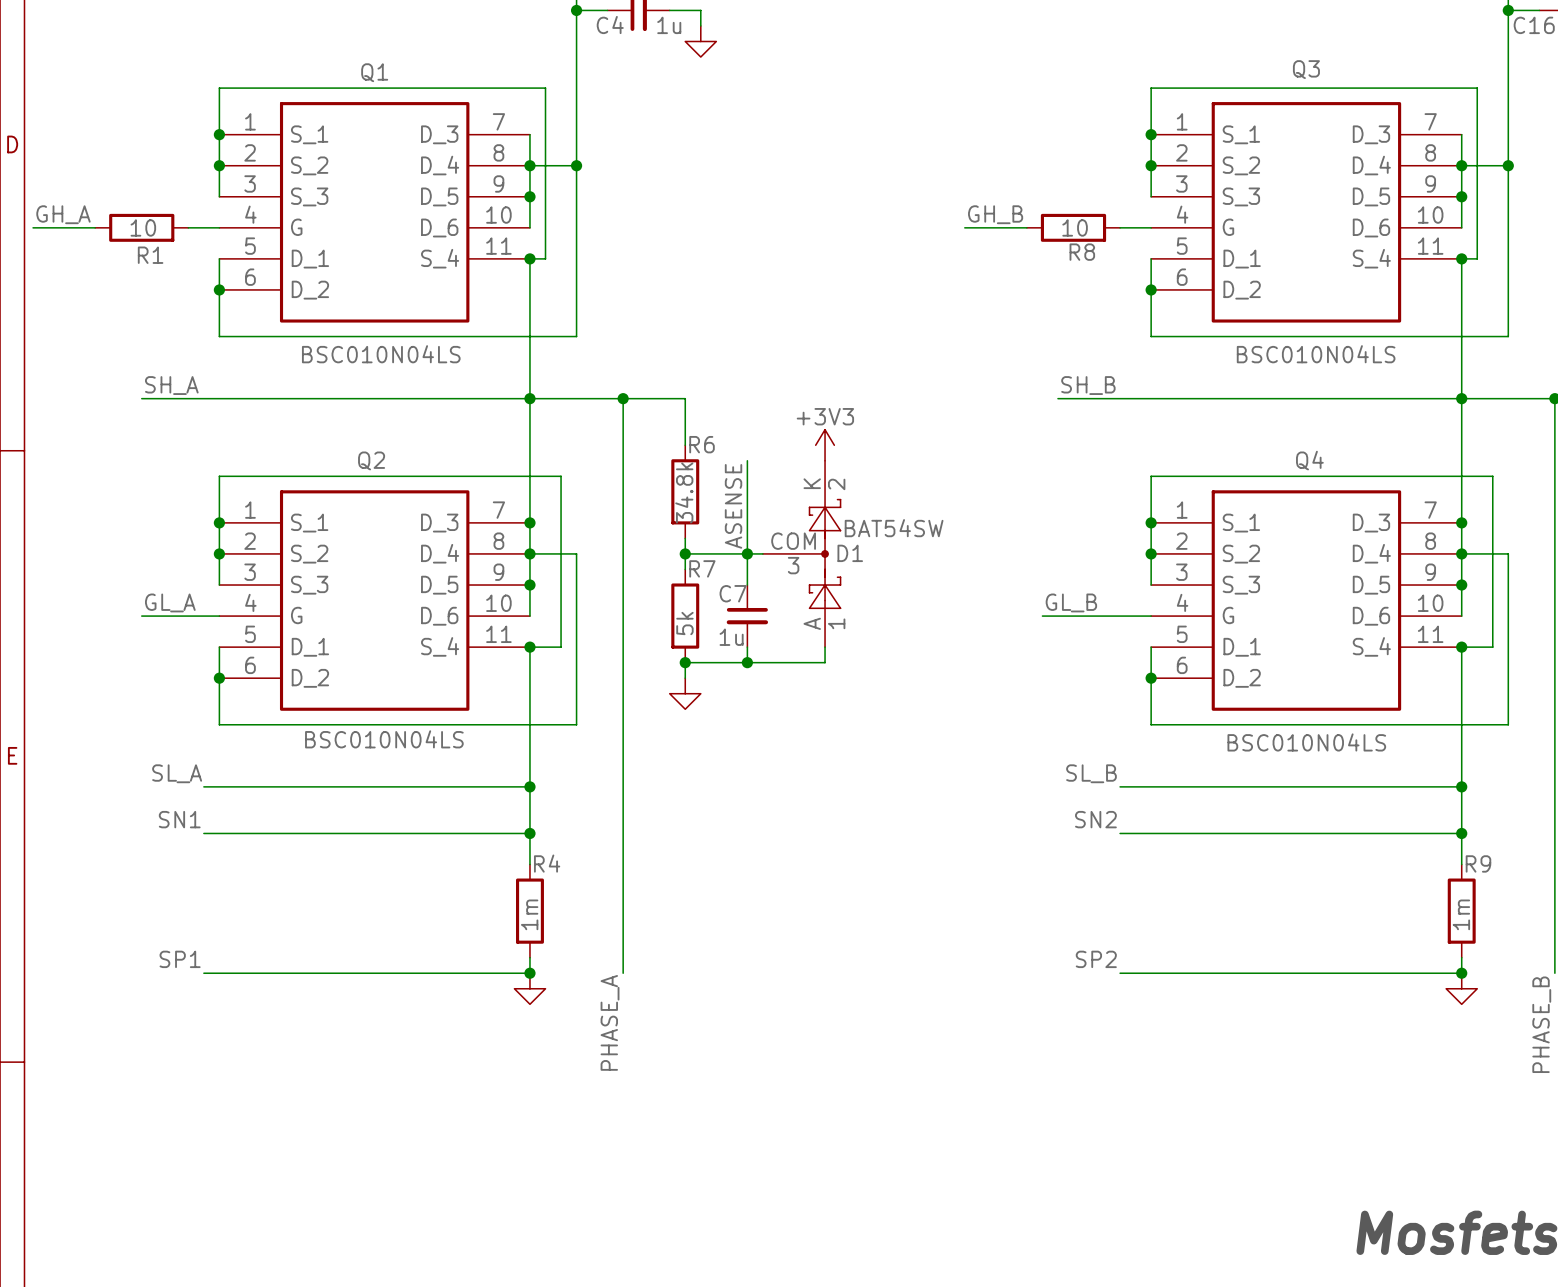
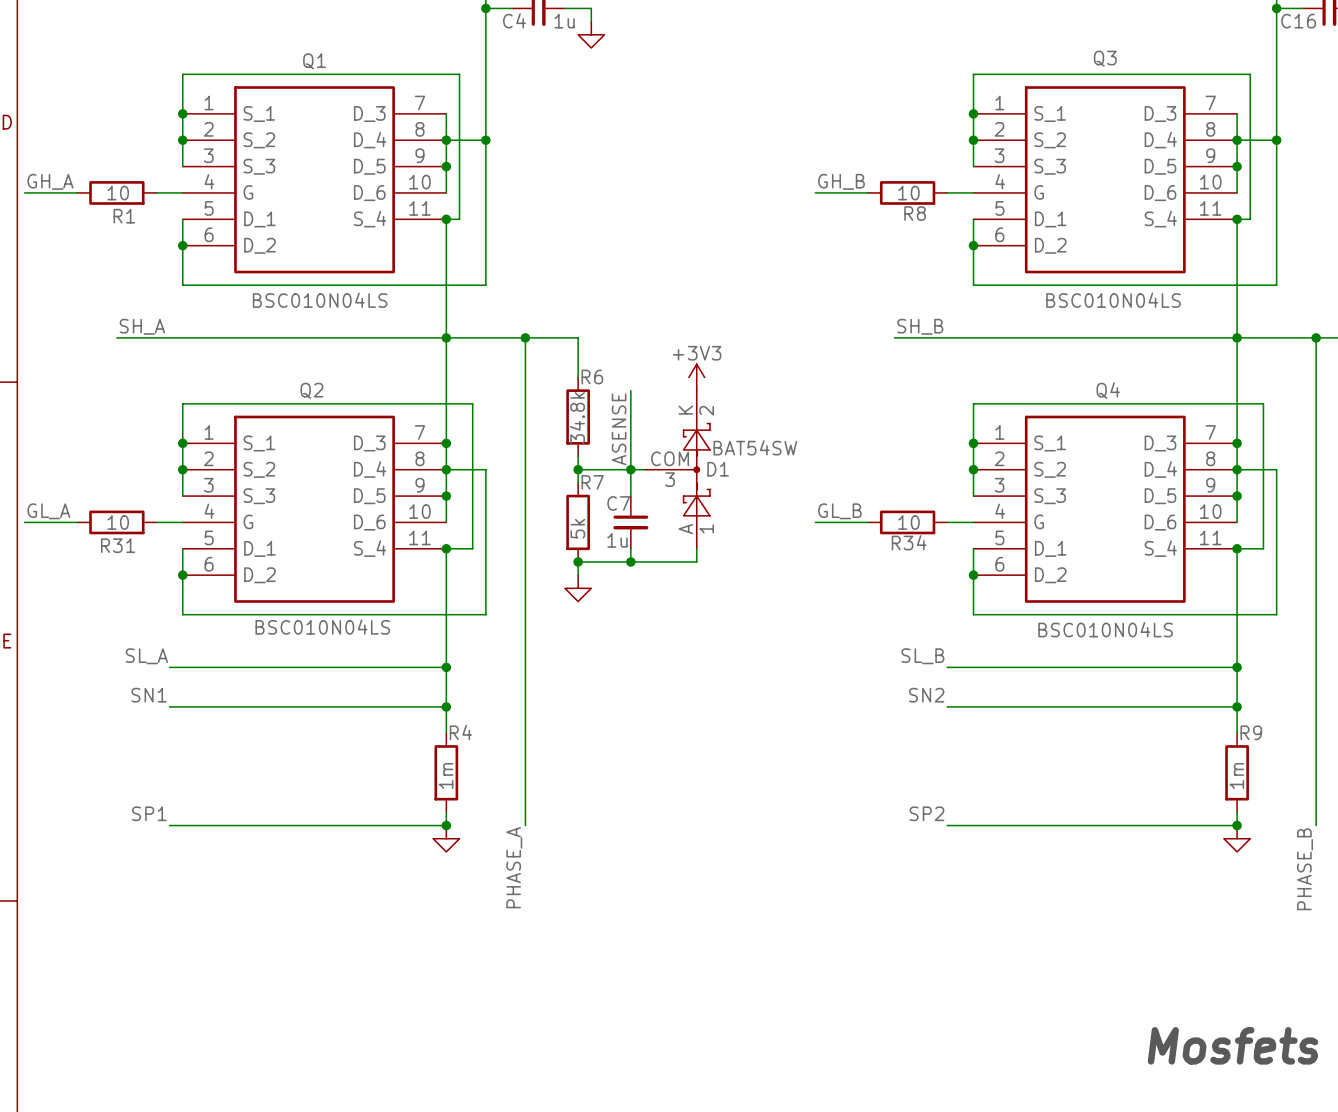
label position: GL_A (170, 602) -> GL_A (48, 511)
label position: GL_B (1071, 602) -> GL_B (839, 511)
wire: none -> (24, 522) (77, 522)
wire: (141, 616) (188, 616) -> none
R31: none -> 10 (116, 522)
wire: none -> (815, 522) (868, 522)
wire: (1042, 616) (1120, 616) -> none
R34: none -> 10 (907, 522)

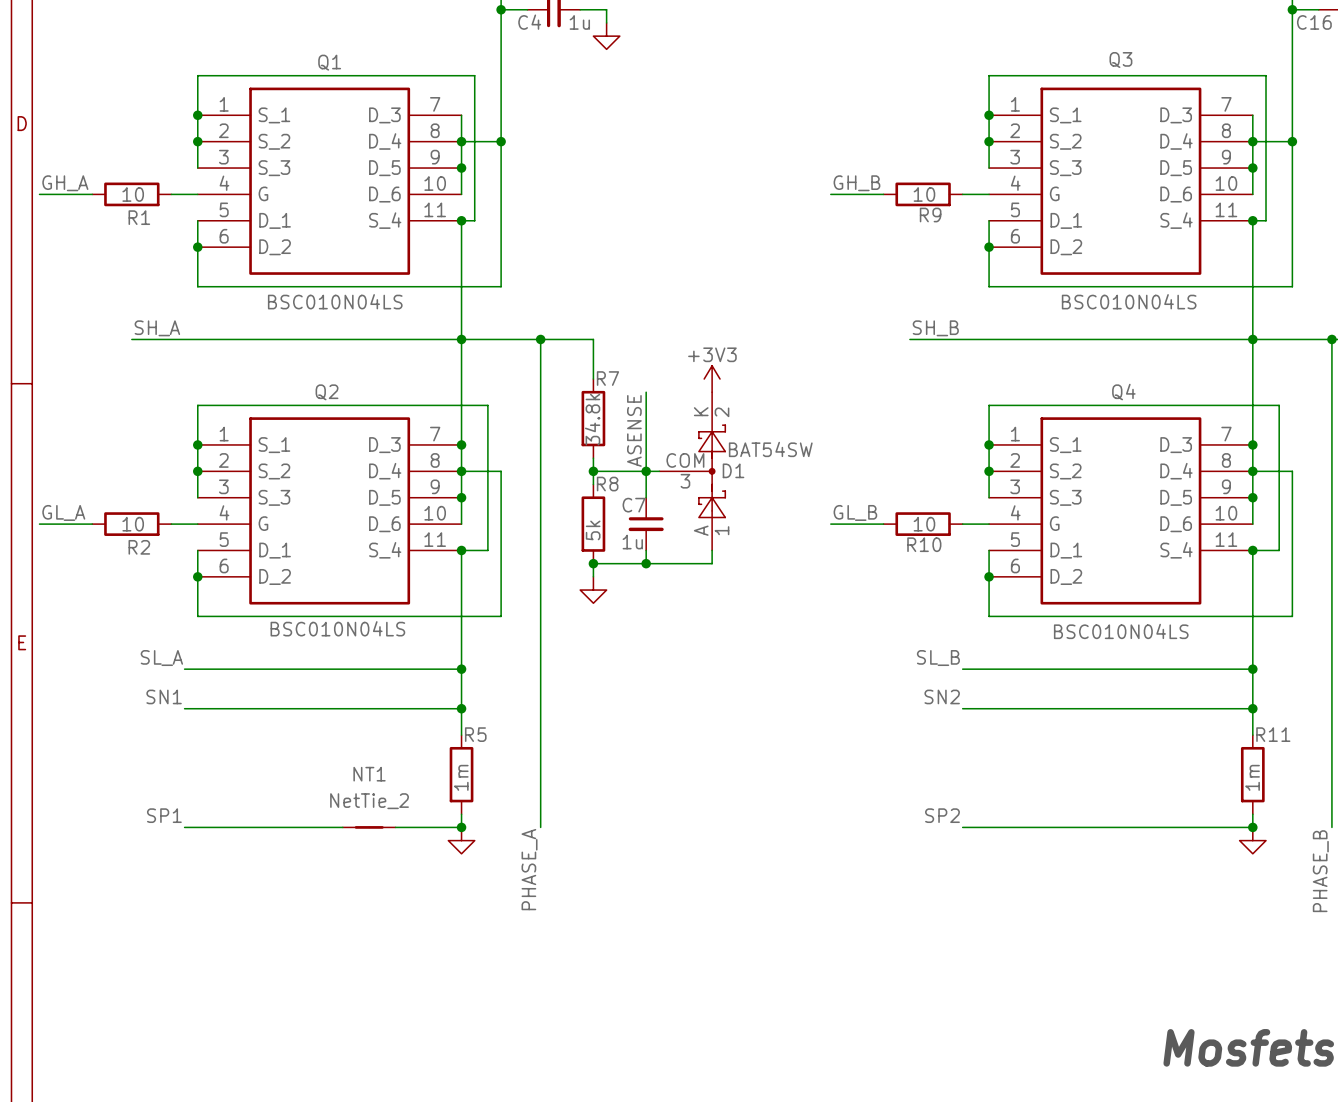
R8 name: R8 (915, 213) -> R9 (930, 215)
R6 name: R6 (592, 376) -> R7 (607, 378)
R7 name: R7 (592, 482) -> R8 (607, 484)
R34 name: R34 (909, 542) -> R10 (924, 544)
R31 name: R31 (118, 545) -> R2 (139, 547)
R4 name: R4 (460, 732) -> R5 (475, 734)
R9 name: R9 (1251, 732) -> R11 (1273, 734)
NT1: none -> NetTie_2 (369, 827)

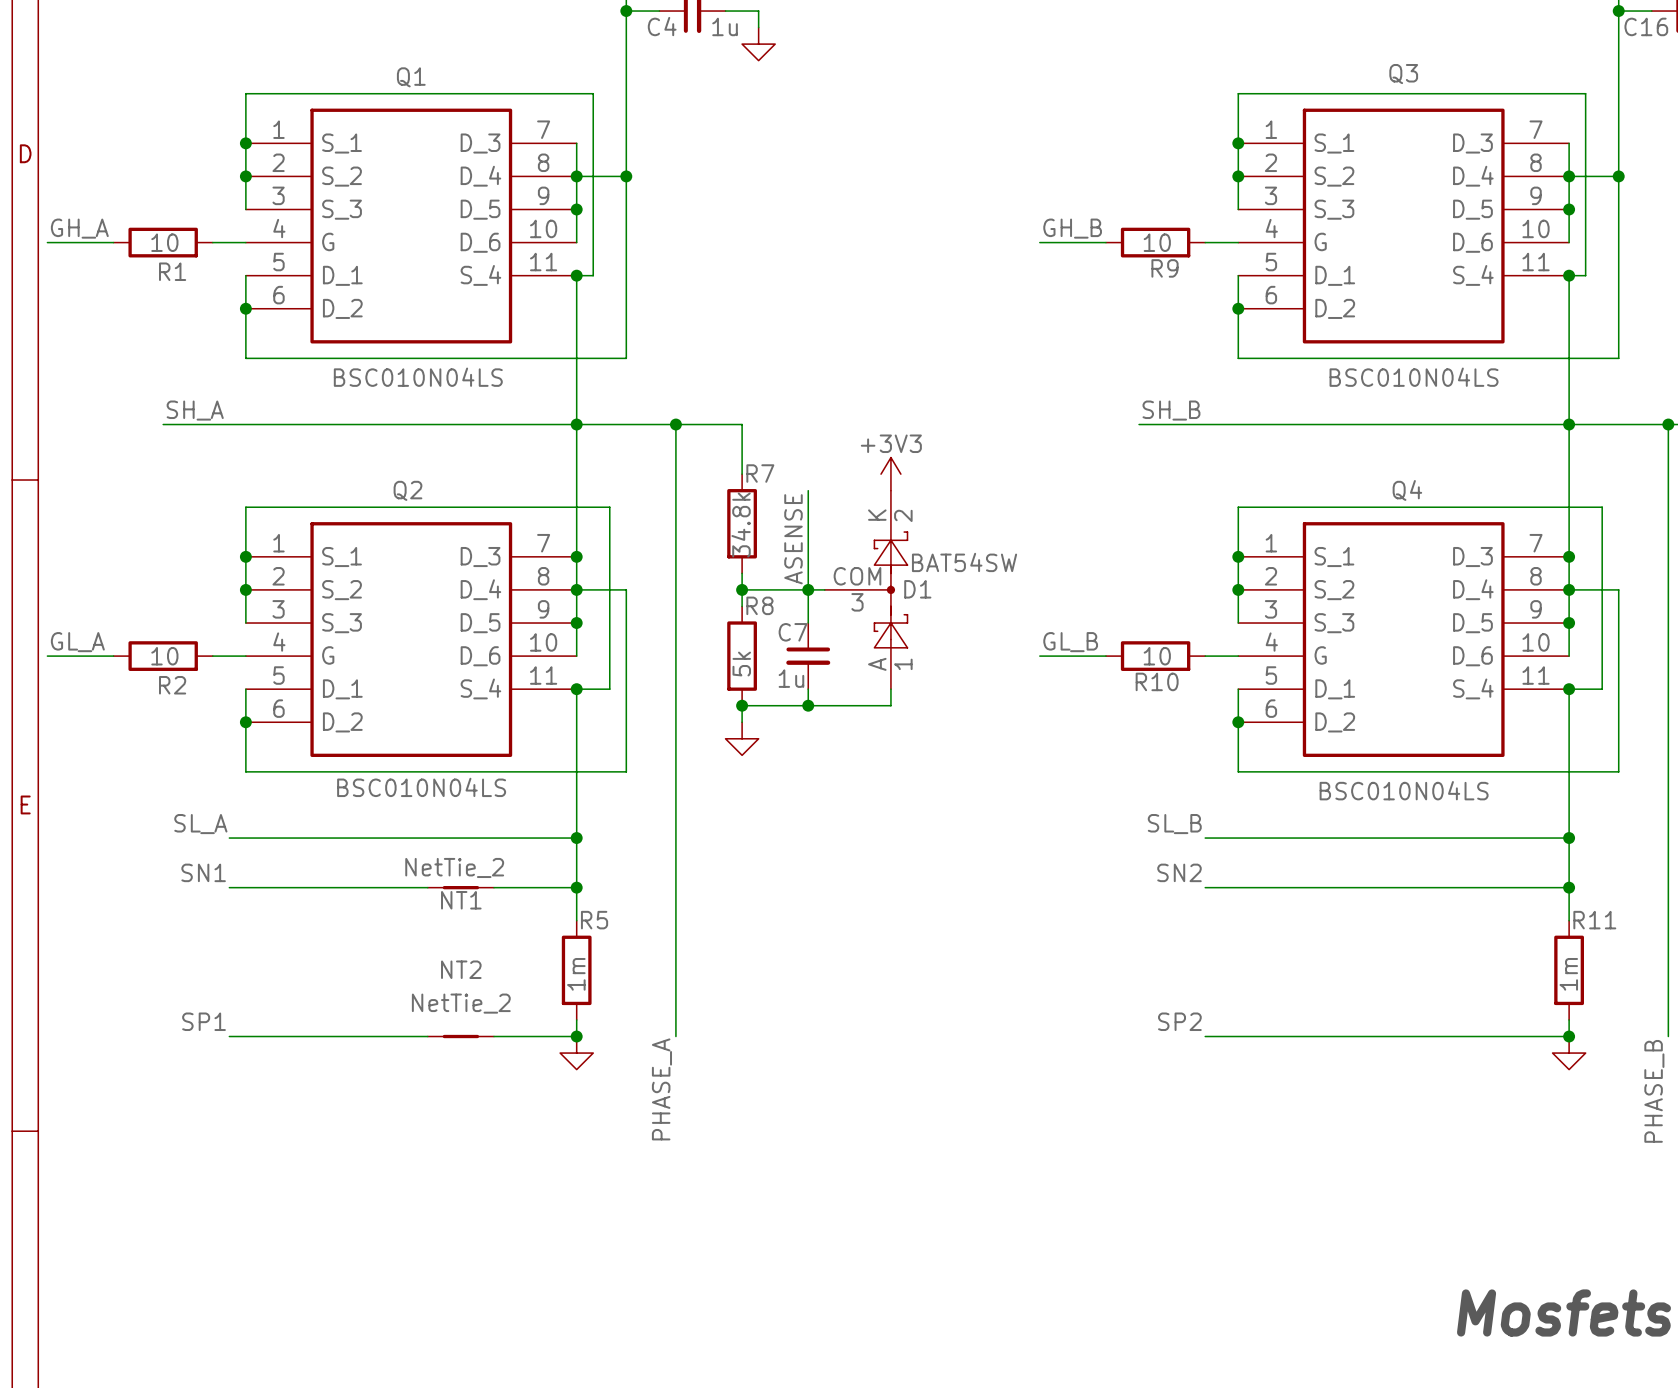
NT1: none -> NetTie_2 (460, 887)
NT1 name: NT1 (369, 774) -> NT2 (461, 969)

